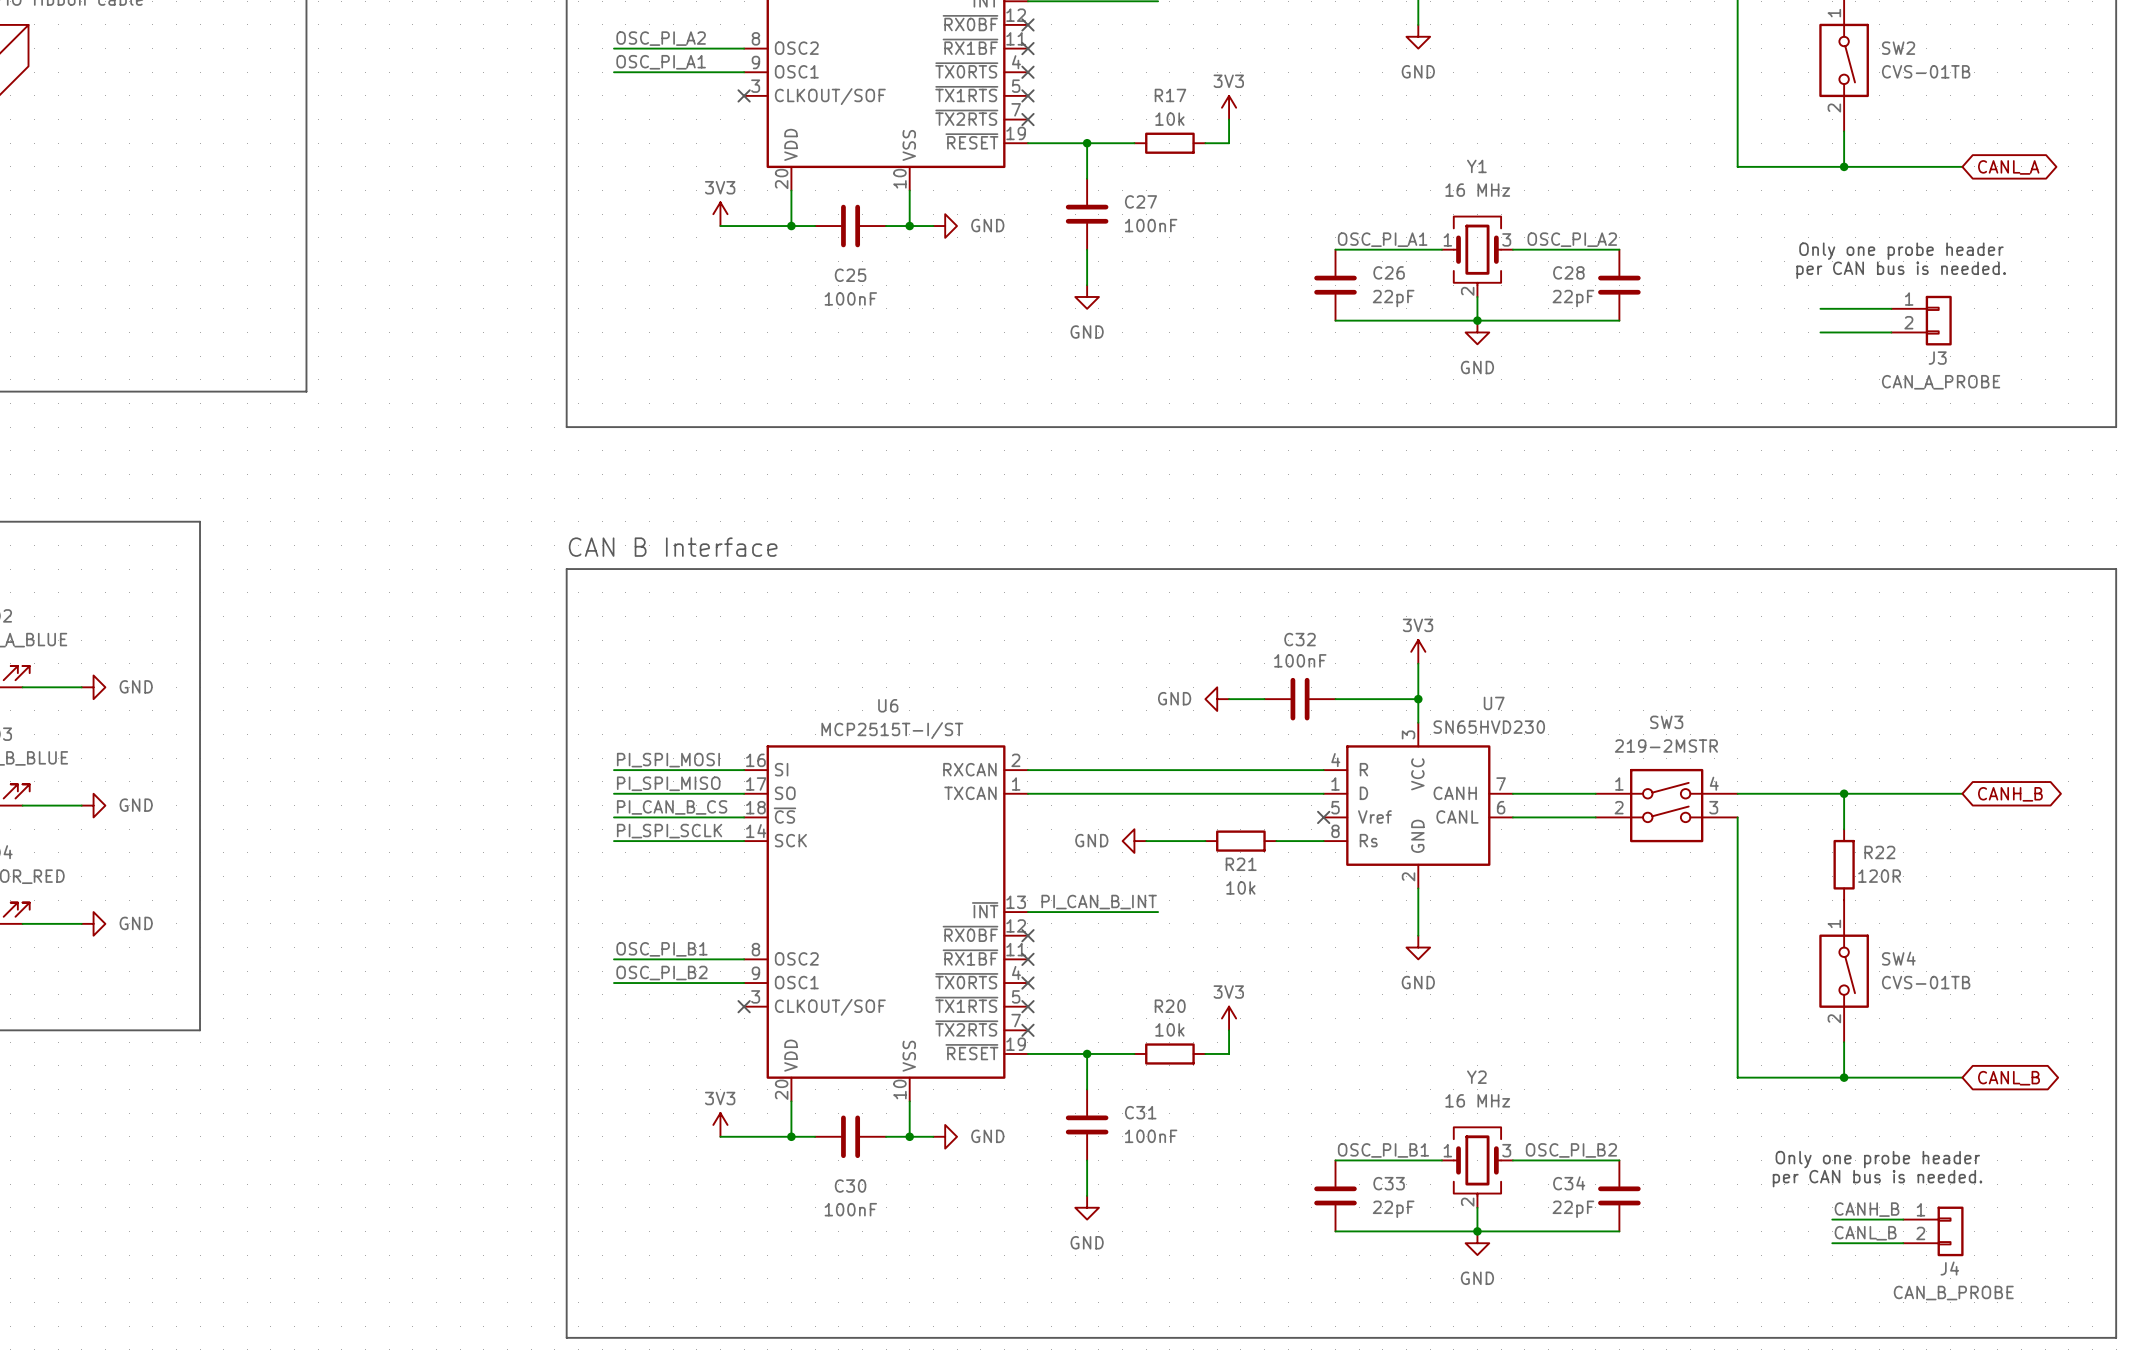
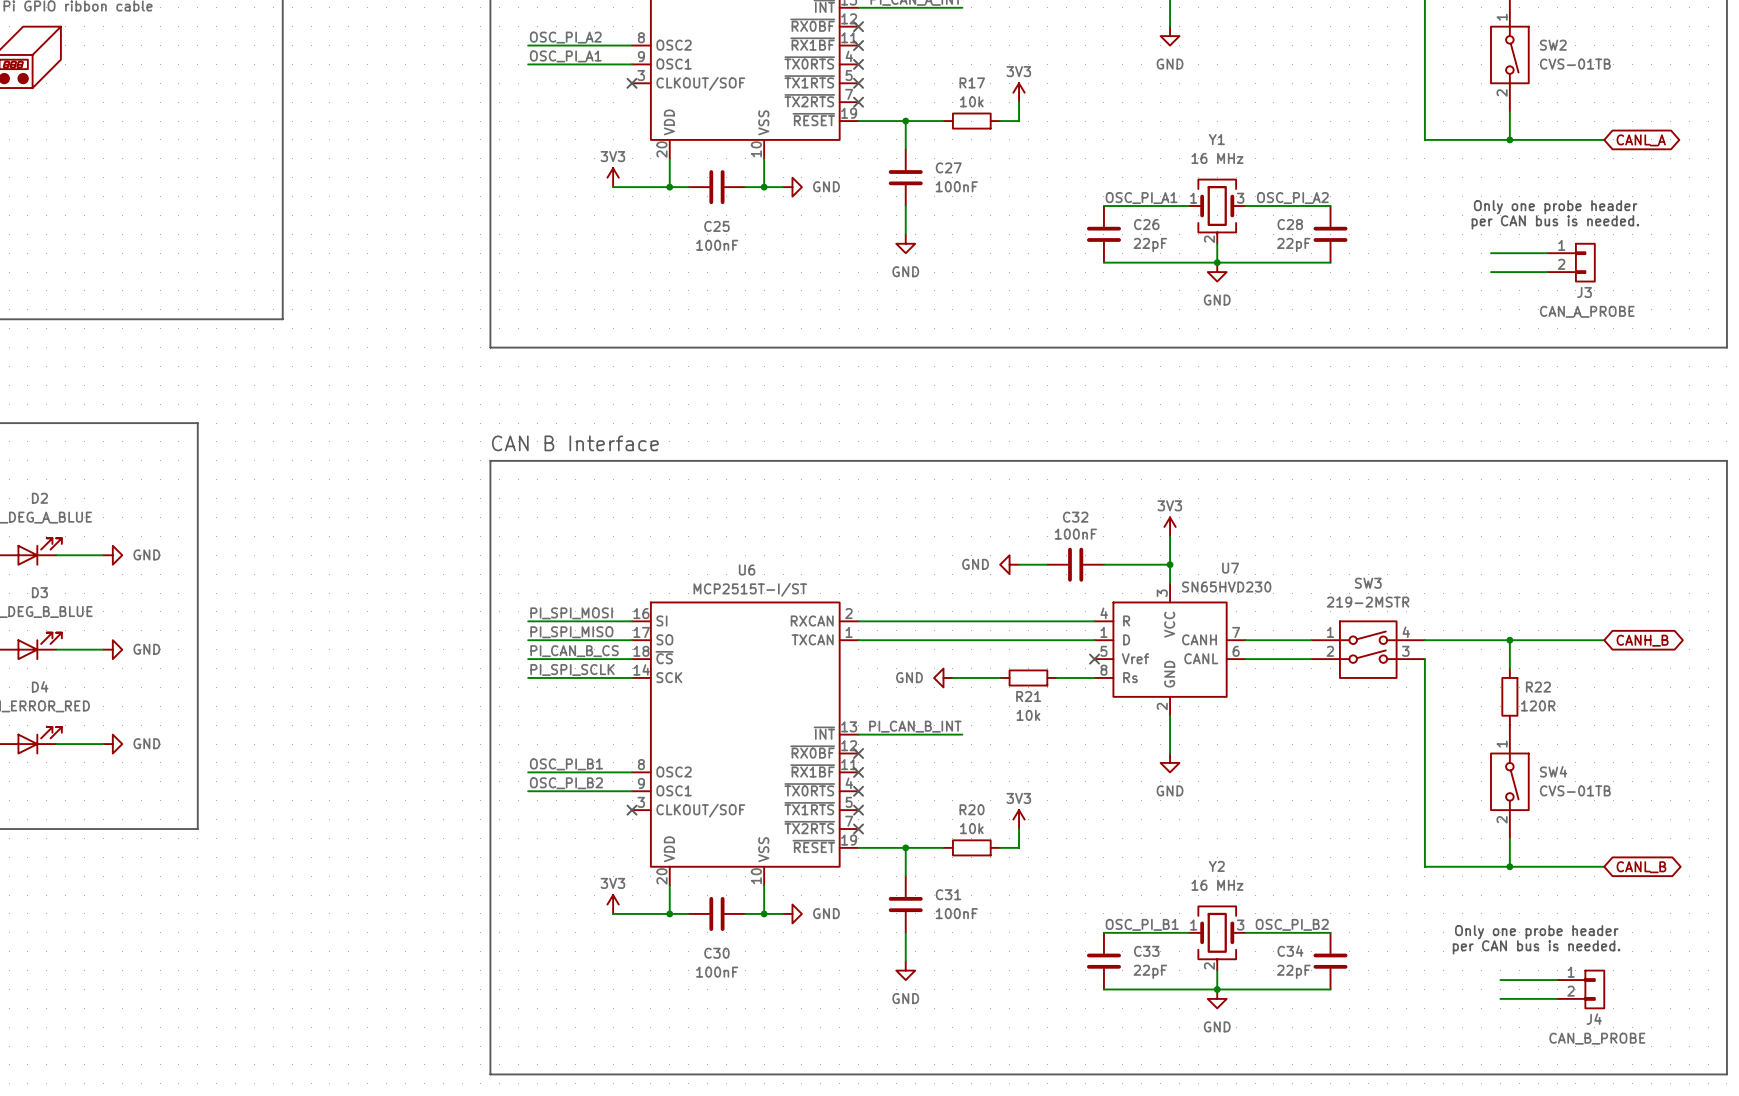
label: CANH_B (1867, 1209) -> none
label: CANL_B (1865, 1233) -> none

